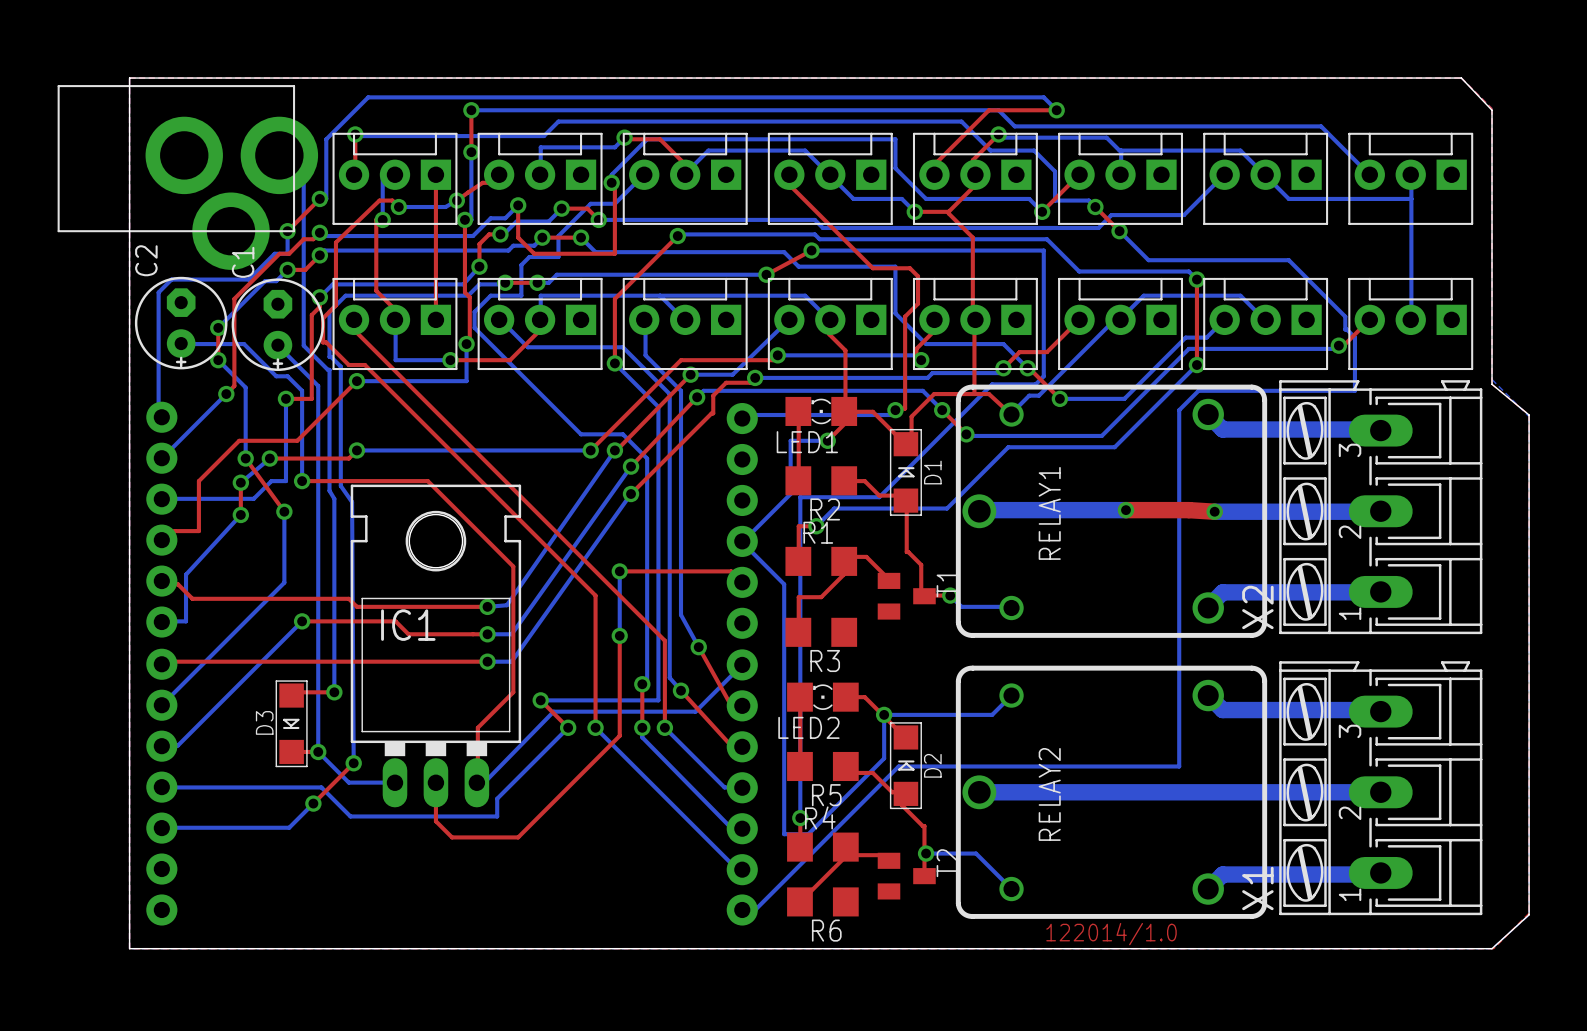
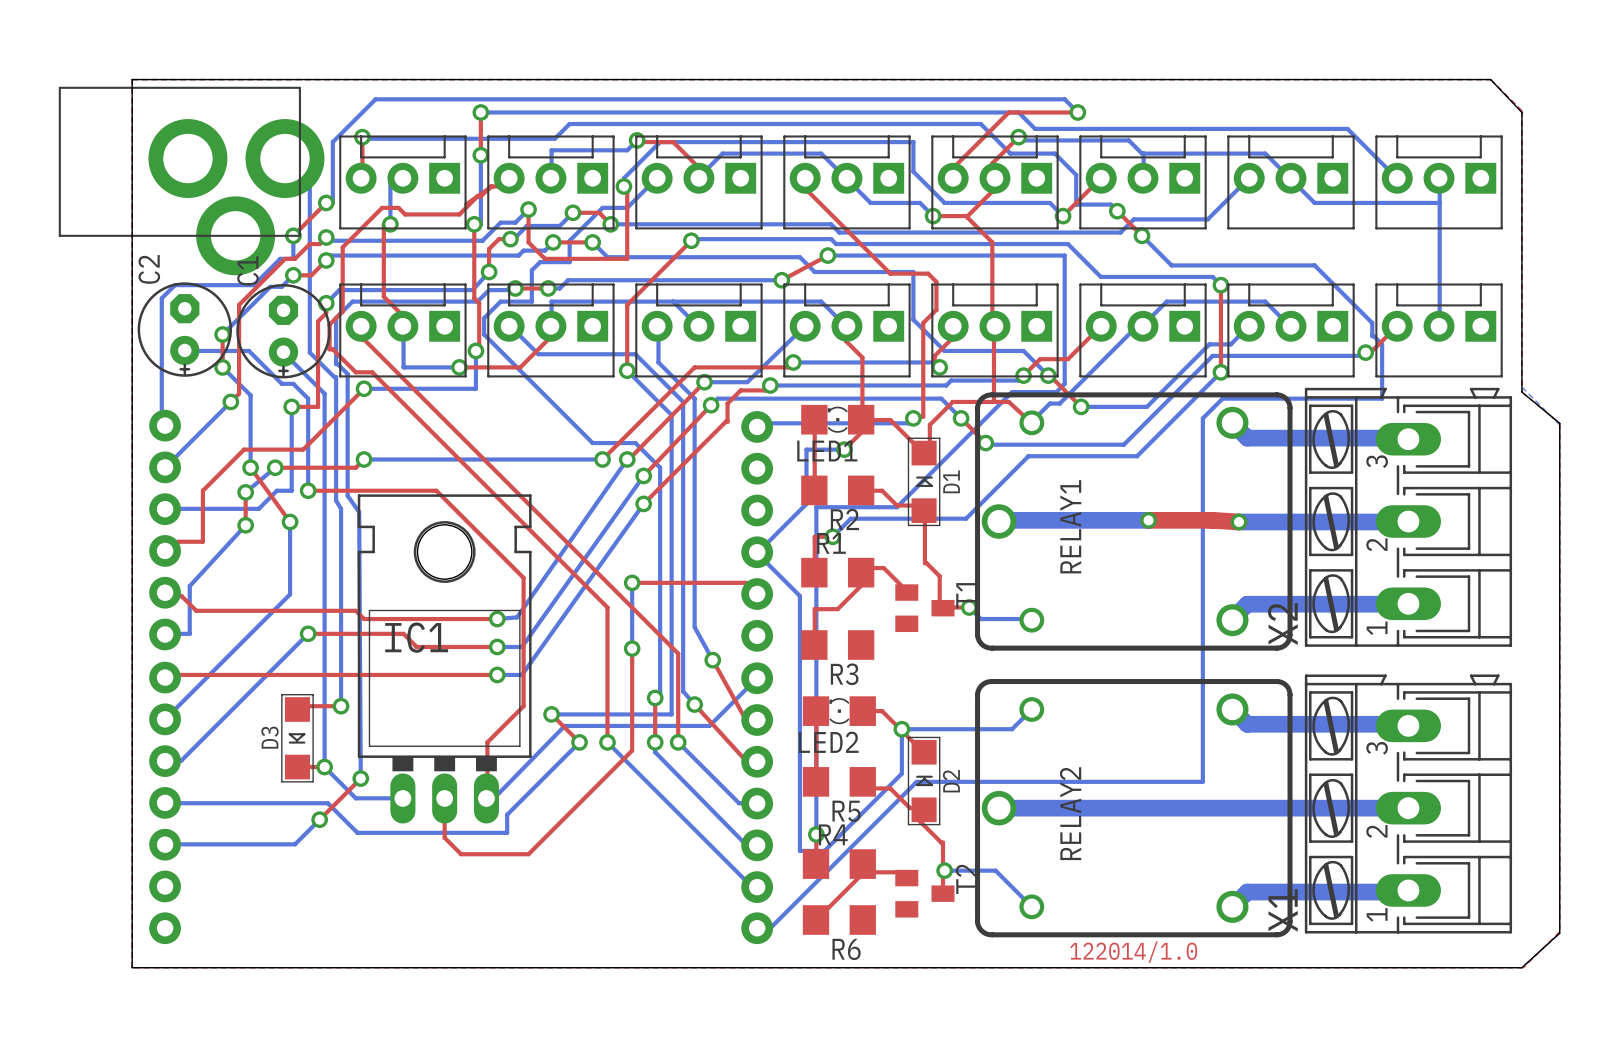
top track: (435, 174) (435, 319) -> none
bottom track: (456, 200) (445, 207) (398, 207) -> none
via: (456, 200) -> none
top track: (398, 207) (392, 200) (379, 200) (335, 242) -> (492, 186) (480, 196) (477, 196) (459, 214) (405, 214) (398, 207) (382, 207) (342, 247)
via: (398, 207) -> none

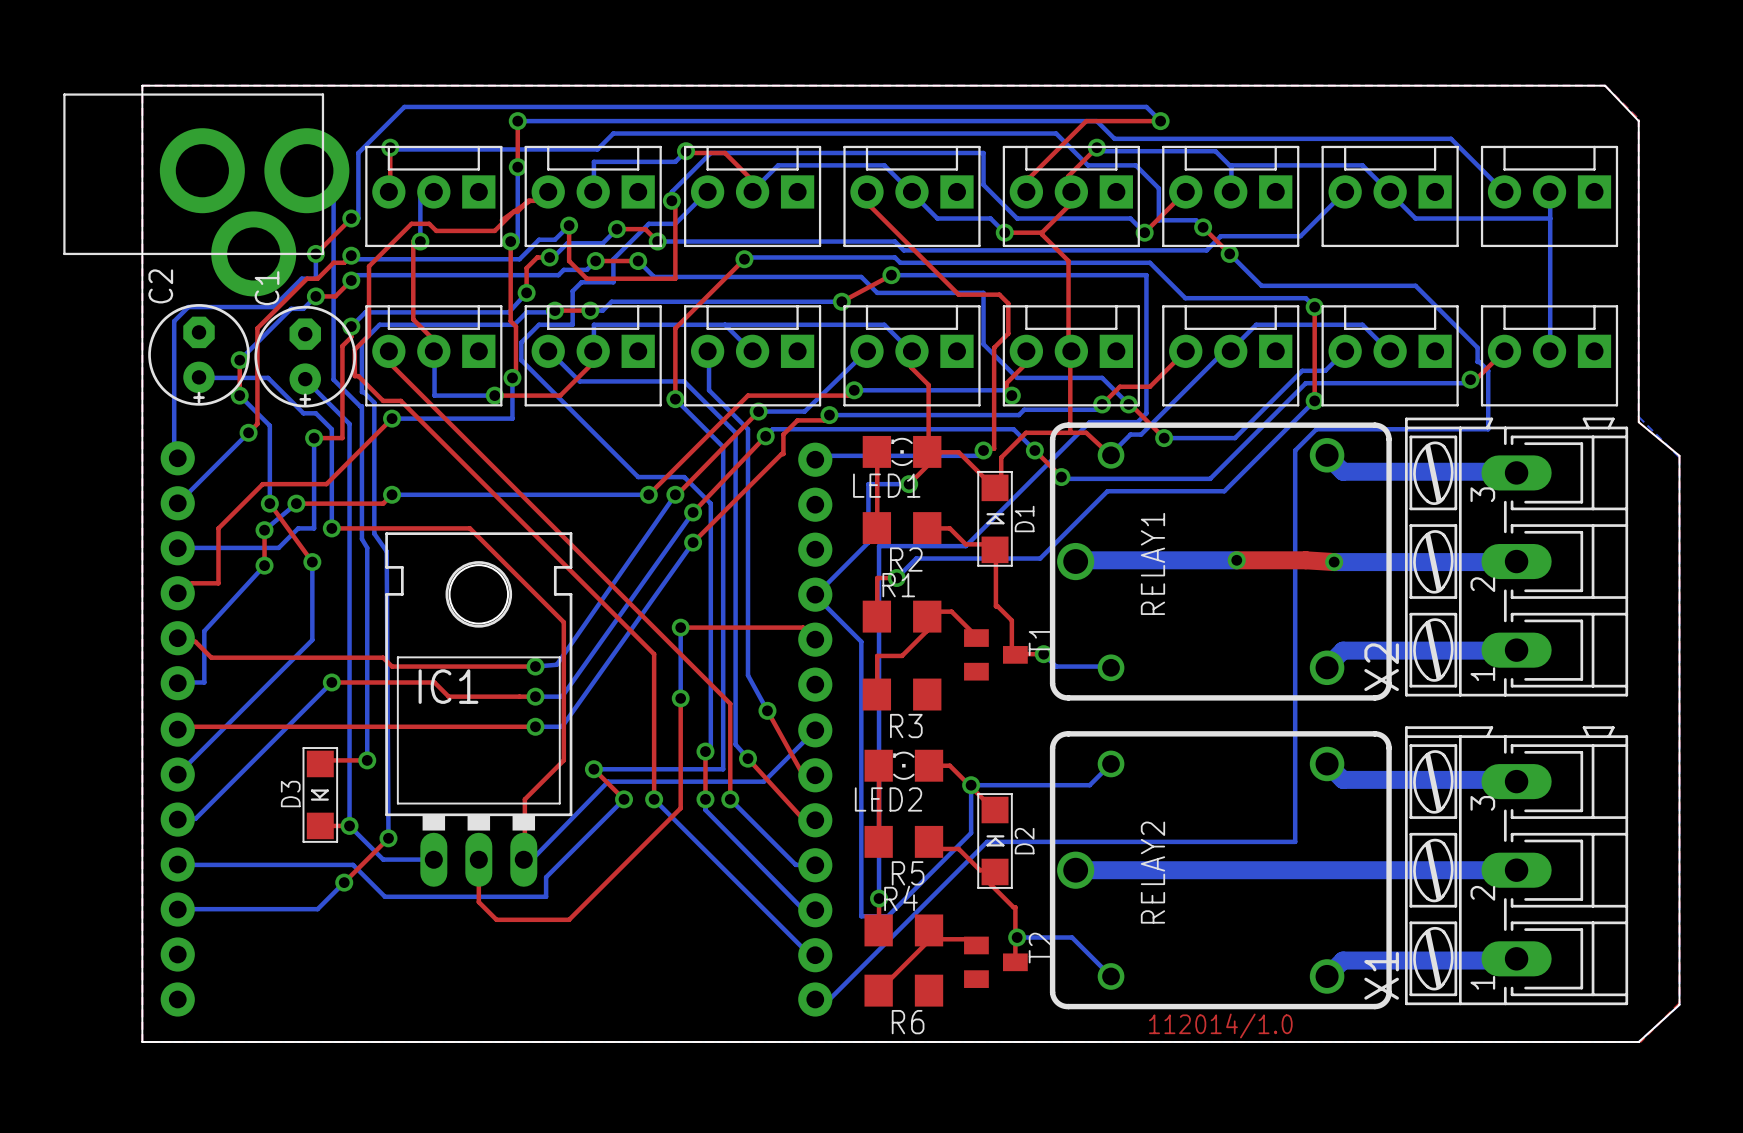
text: 122014/1.0 (1133, 952) -> 112014/1.0 (1220, 1025)

